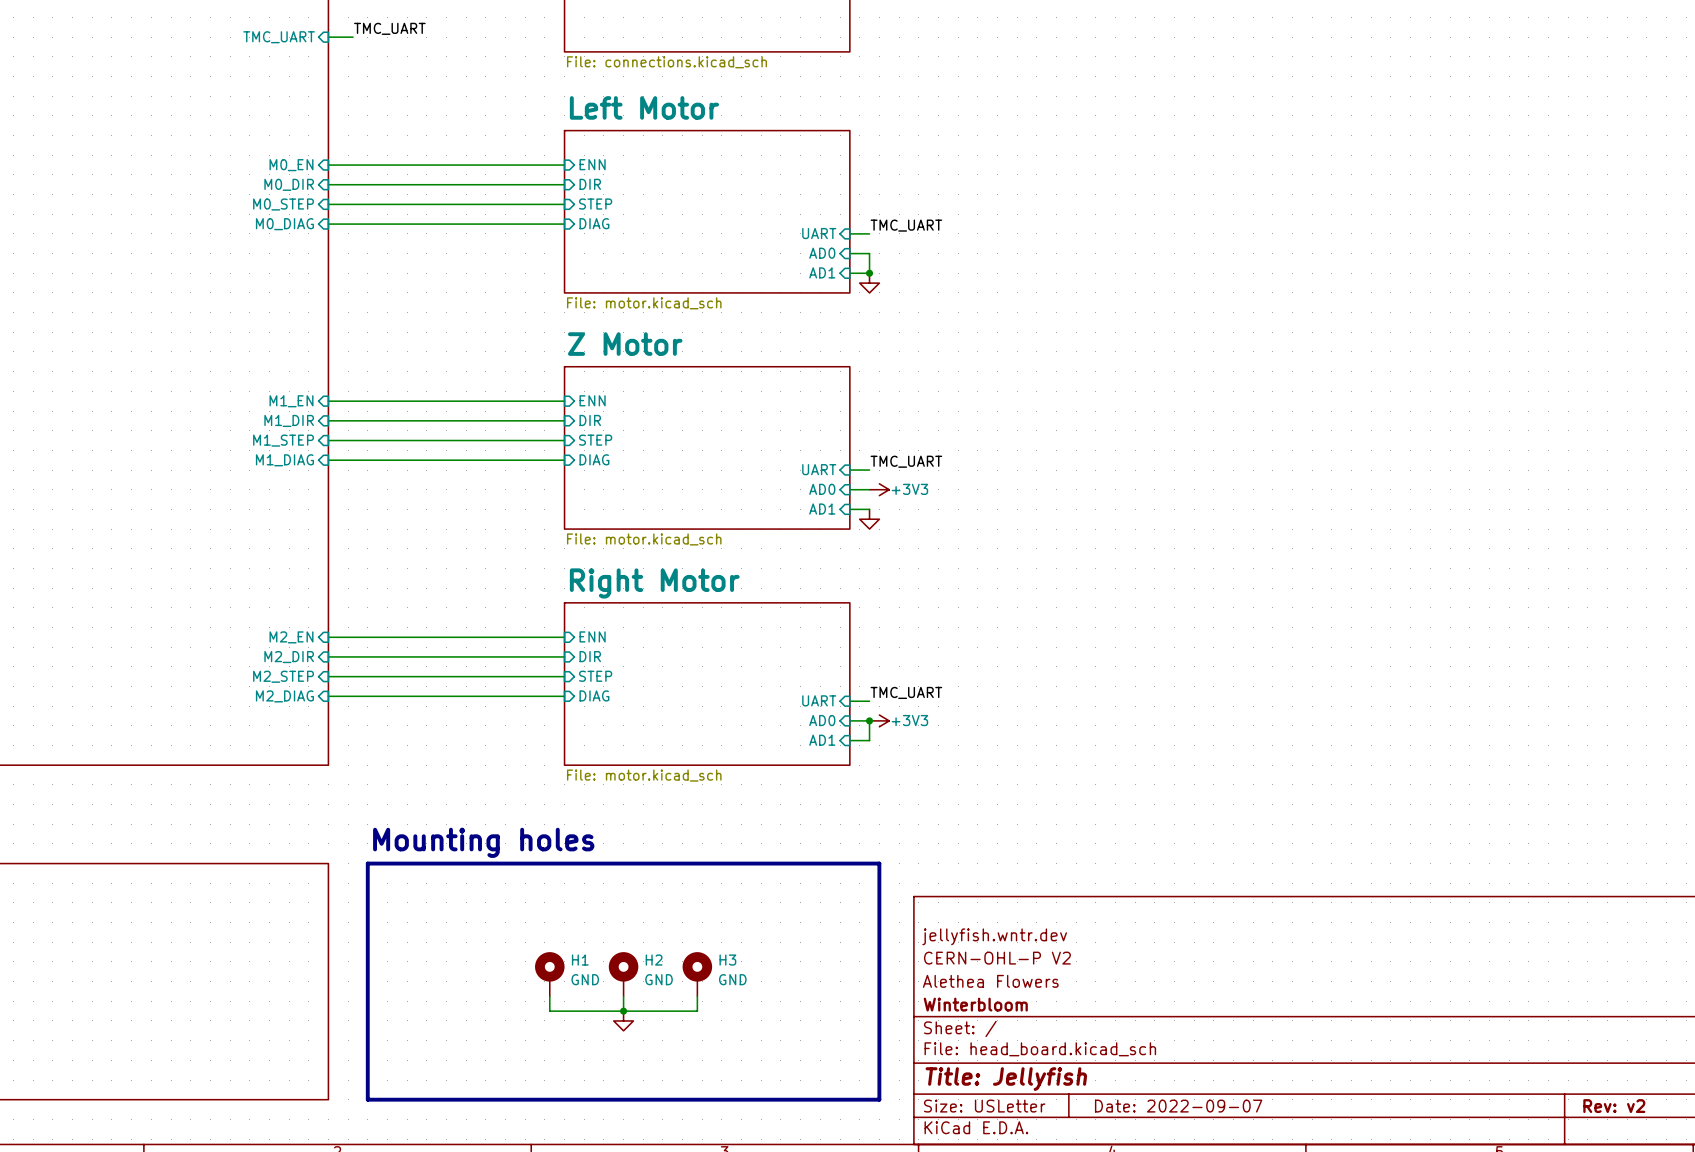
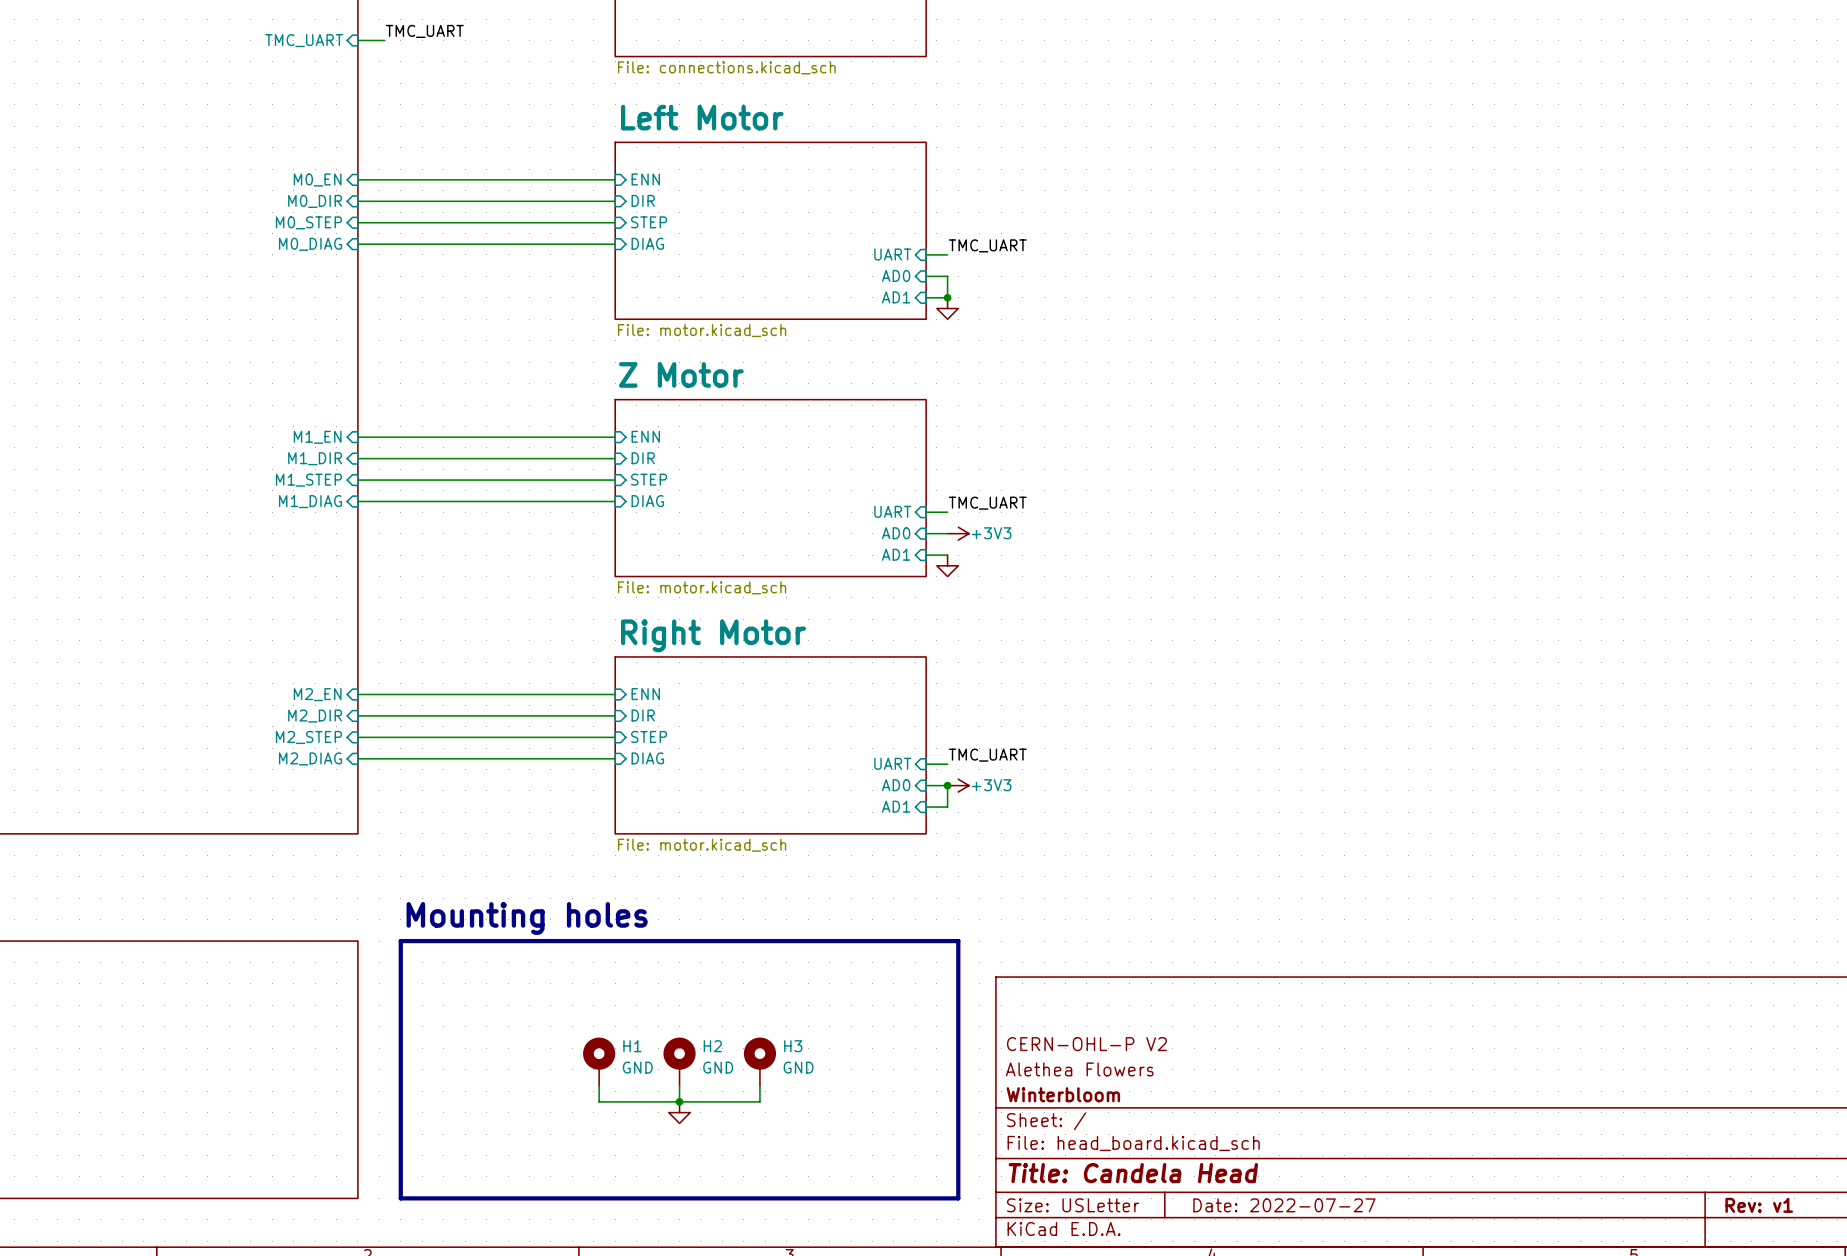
title block: jellyfish.wntr.dev (994, 936) -> none
title block: Title: Jellyfish (1006, 1079) -> Title: Candela Head (1133, 1173)
title block: Date: 2022-09-07 (1178, 1106) -> Date: 2022-07-27 (1284, 1205)
title block: Rev: v2 (1614, 1106) -> Rev: v1 (1759, 1205)

